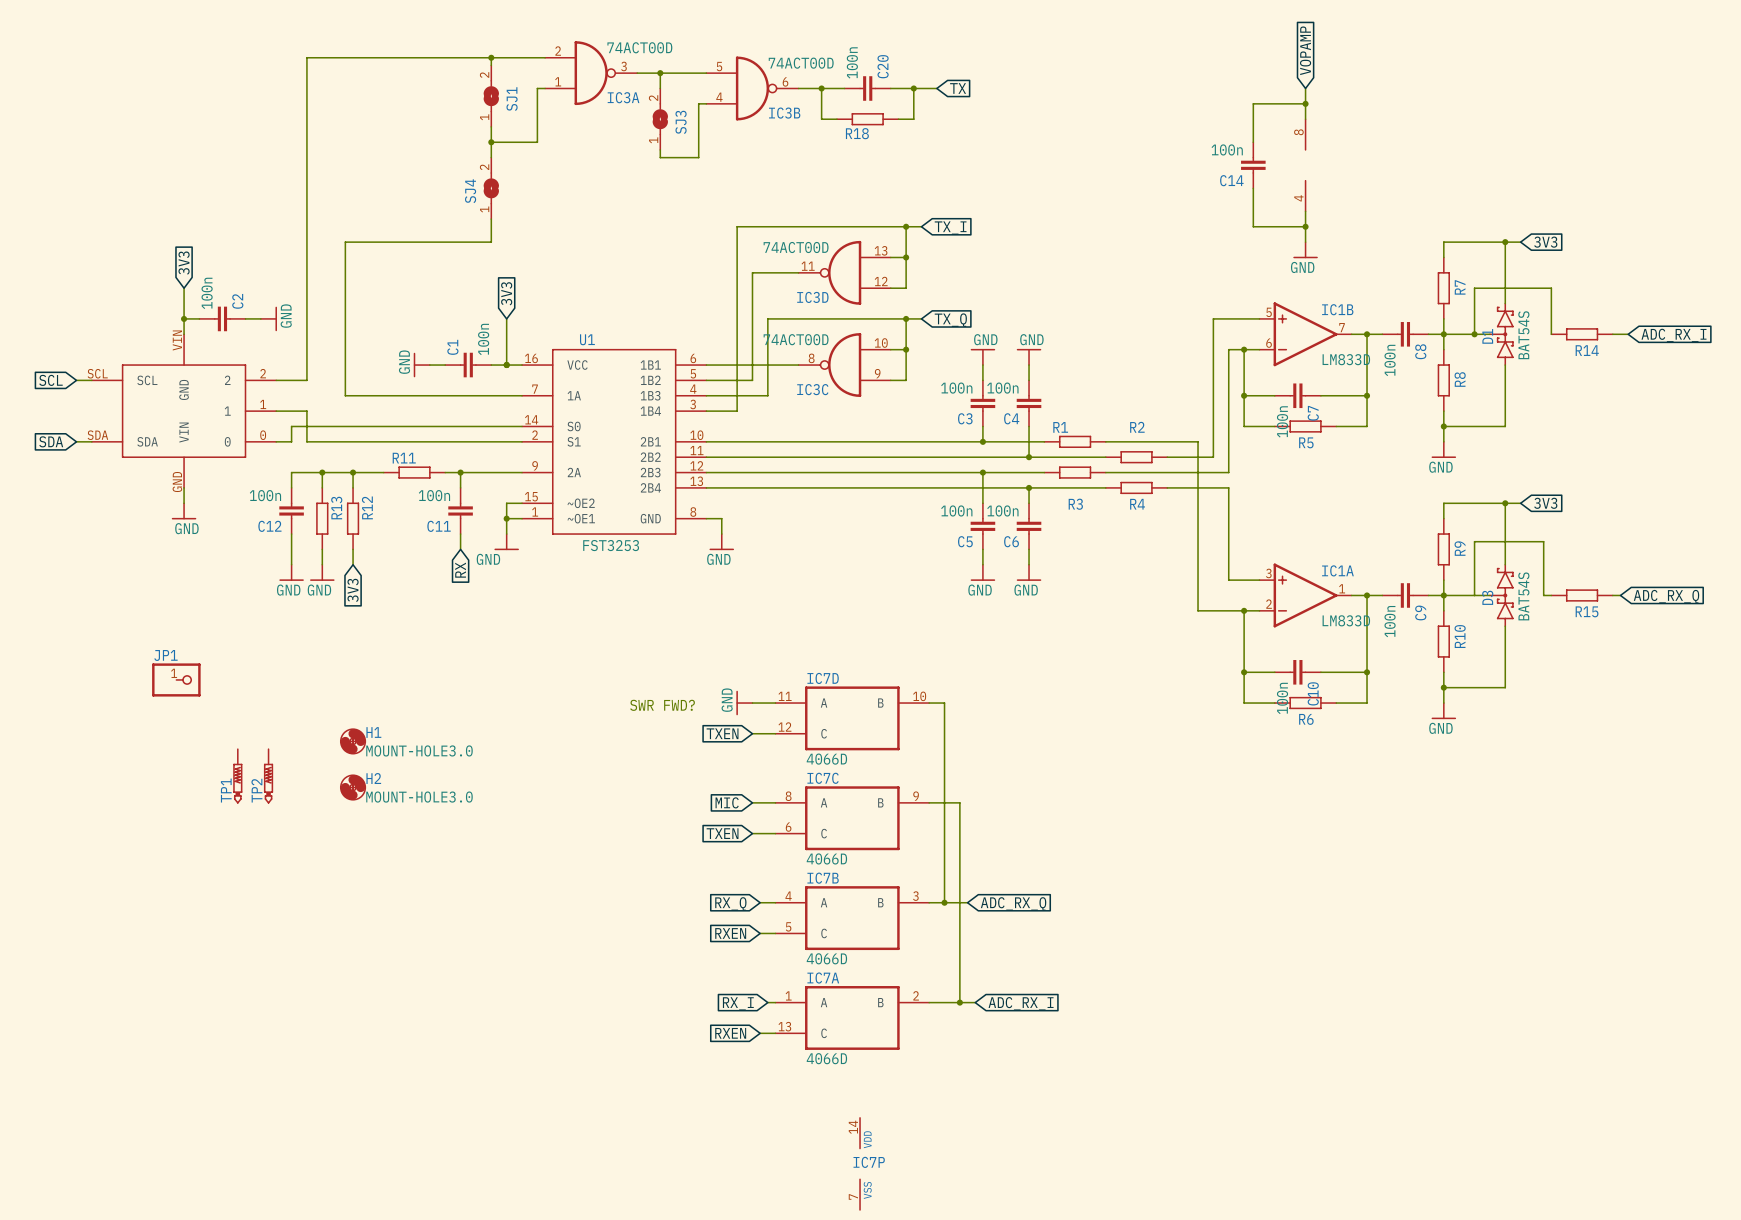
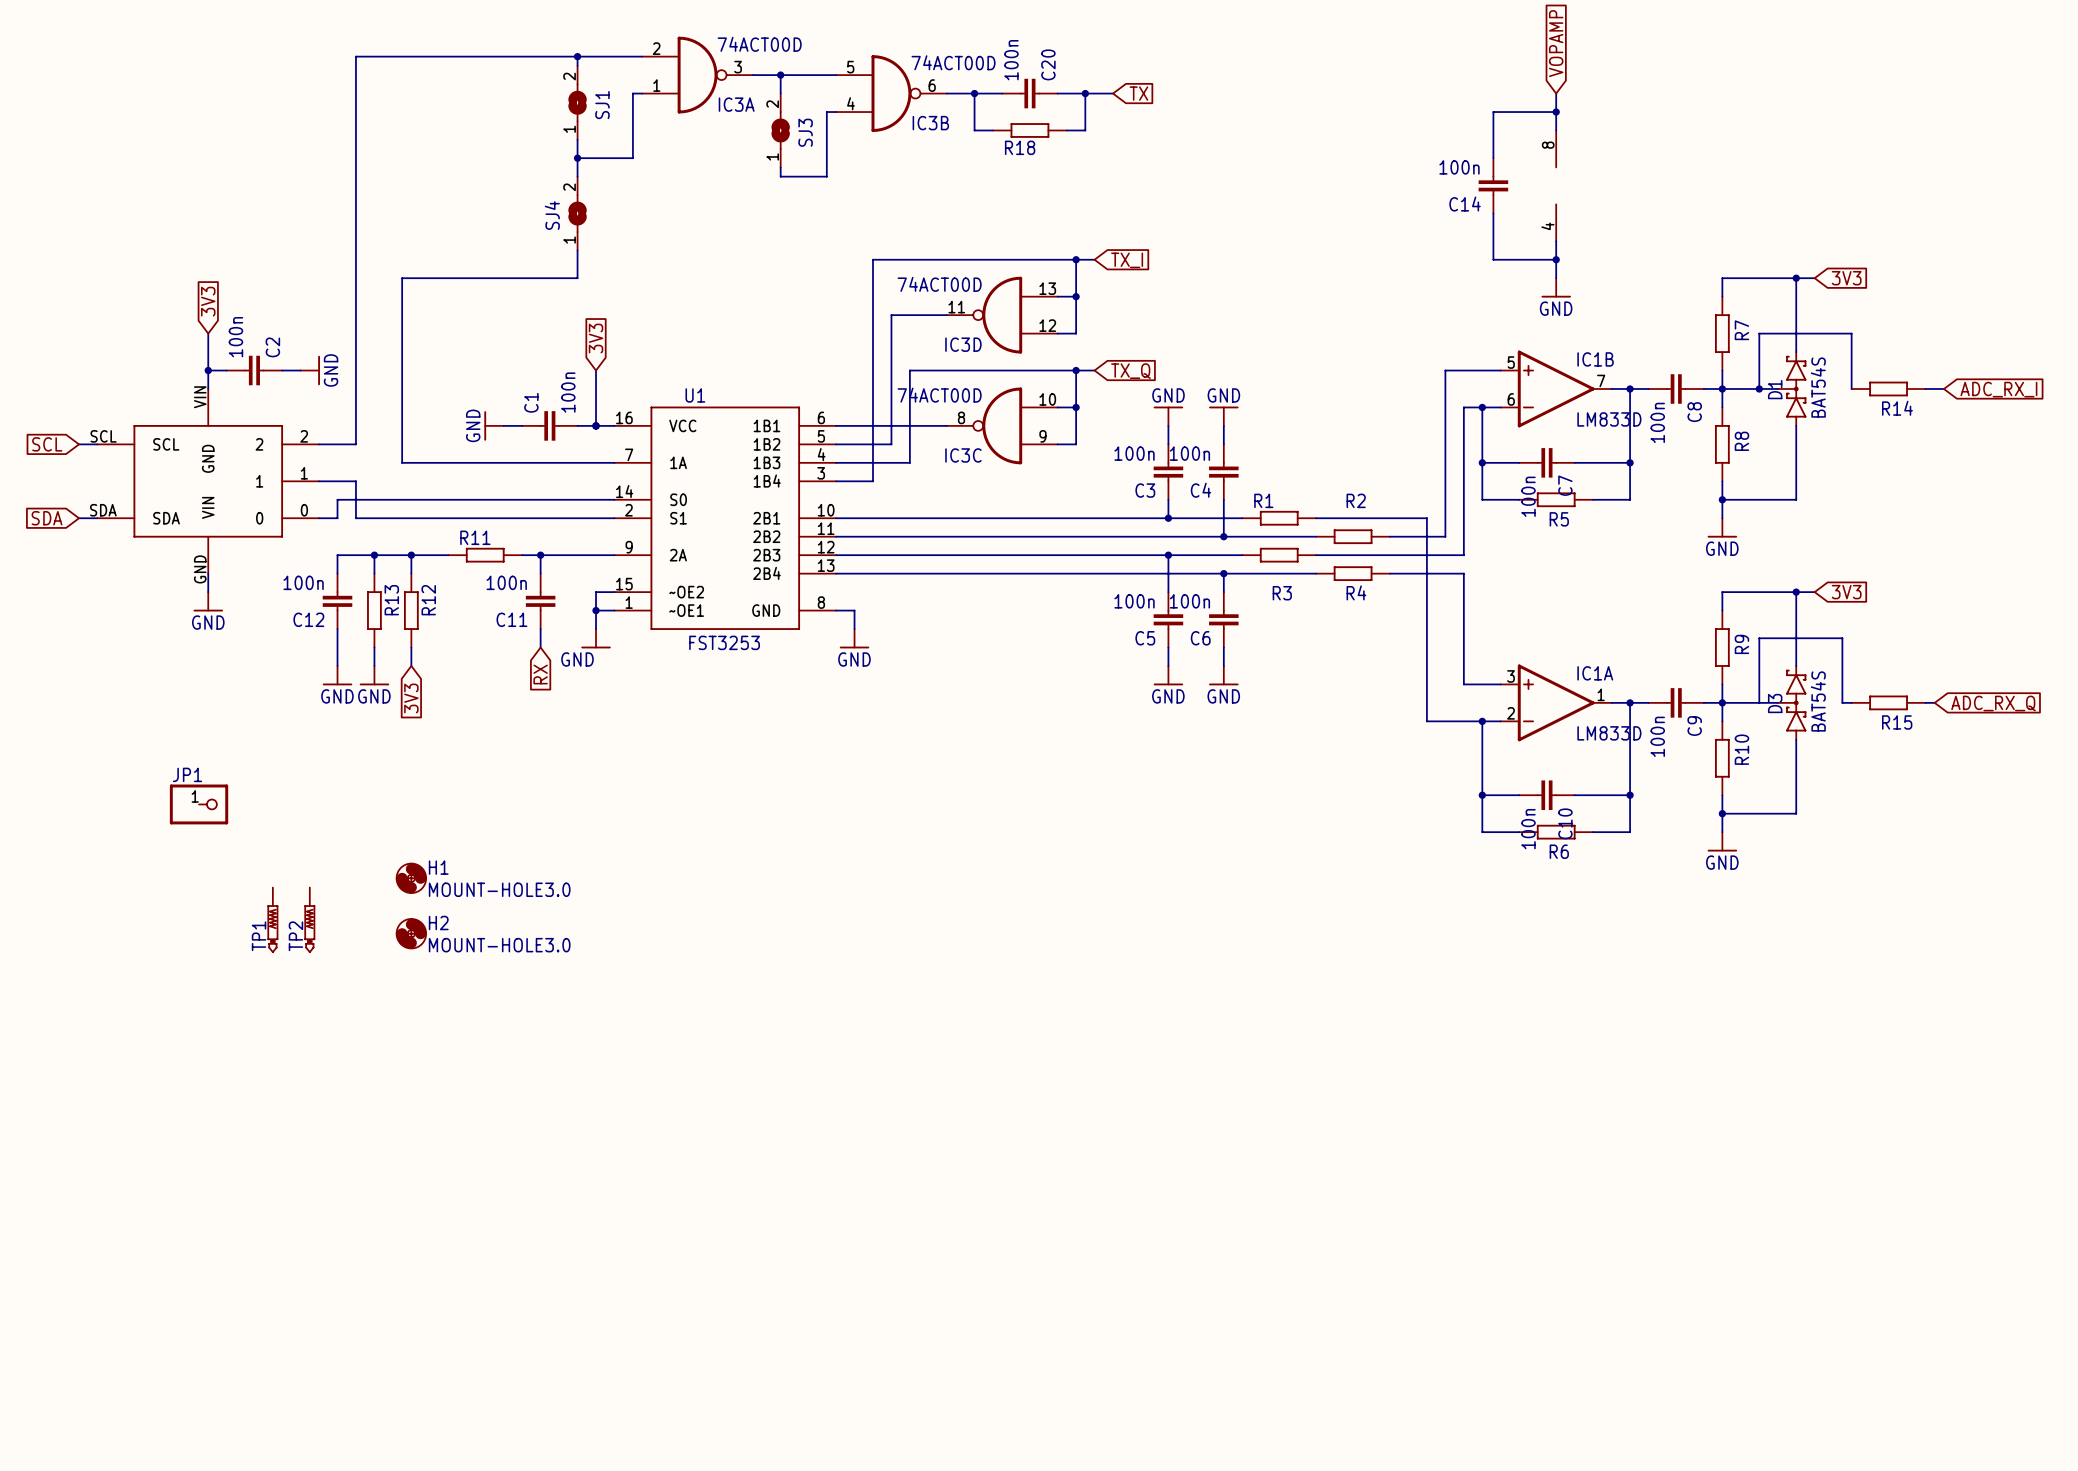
power symbol: GND (744, 703) -> none
wire: (752, 703) (775, 703) -> none
wire: (929, 703) (944, 703) (944, 902) -> none
text: SWR FWD? (662, 705) -> none
IC7D: 4066D (852, 718) -> none
global label: TXEN (722, 733) -> none
wire: (752, 733) (775, 733) -> none
global label: MIC (727, 802) -> none
wire: (752, 802) (775, 802) -> none
wire: (929, 802) (959, 802) (959, 1002) -> none
IC7C: 4066D (852, 818) -> none
global label: TXEN (722, 833) -> none
wire: (752, 833) (775, 833) -> none
wire: (760, 902) (775, 902) -> none
wire: (929, 902) (967, 902) -> none
junction: (944, 902) -> none
global label: RX_Q (730, 903) -> none
global label: ADC_RX_Q (1013, 903) -> none
IC7B: 4066D (852, 918) -> none
global label: RXEN (730, 933) -> none
wire: (760, 933) (775, 933) -> none
wire: (767, 1002) (775, 1002) -> none
wire: (929, 1002) (975, 1002) -> none
junction: (959, 1002) -> none
global label: RX_I (738, 1003) -> none
global label: ADC_RX_I (1021, 1003) -> none
IC7A: 4066D (852, 1017) -> none
global label: RXEN (730, 1033) -> none
wire: (760, 1033) (775, 1033) -> none
IC7P: (860, 1163) -> none

